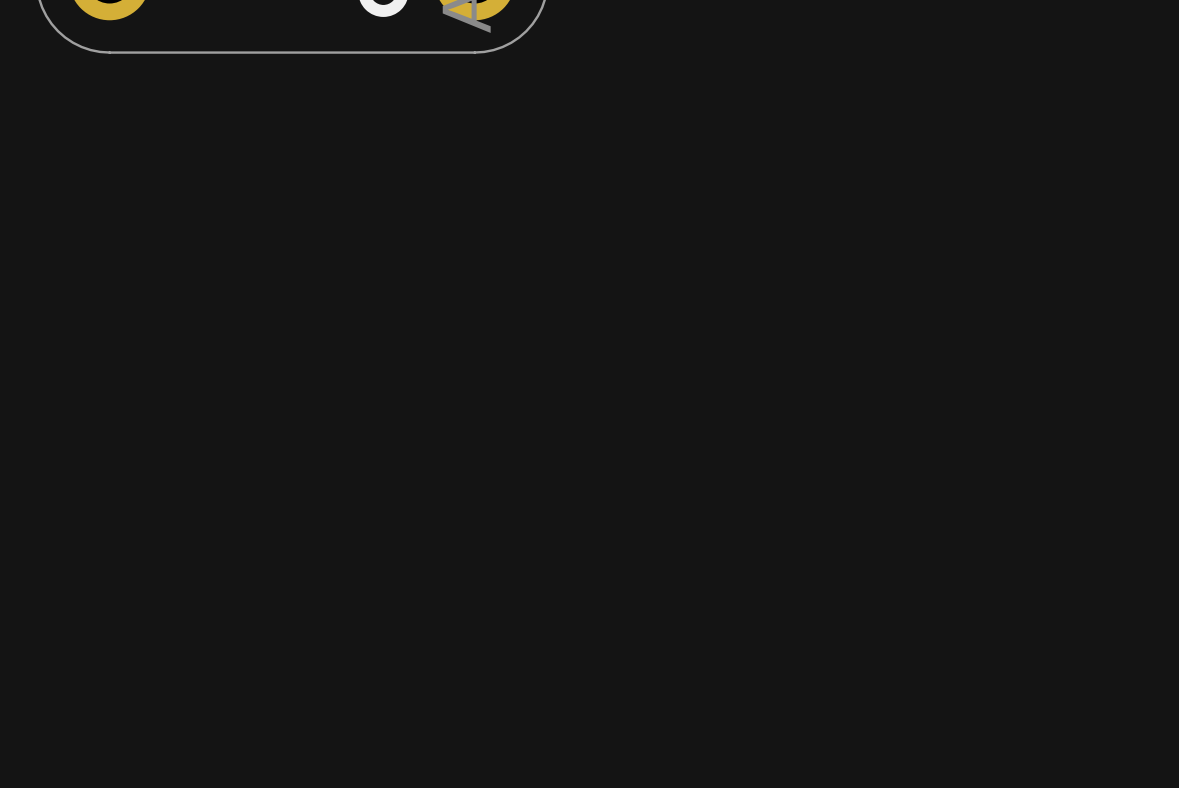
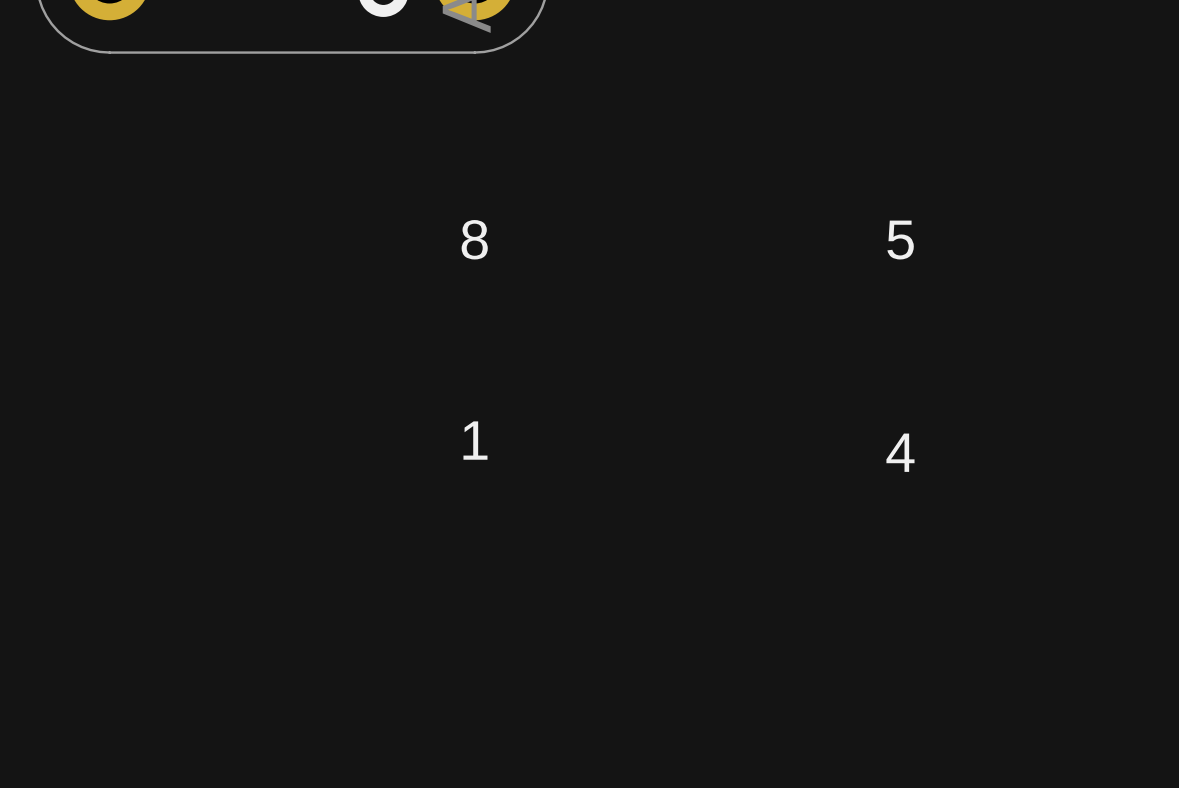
text: none -> 8 (474, 239)
text: none -> 5 (900, 240)
text: none -> 1 (475, 440)
text: none -> 4 (900, 452)

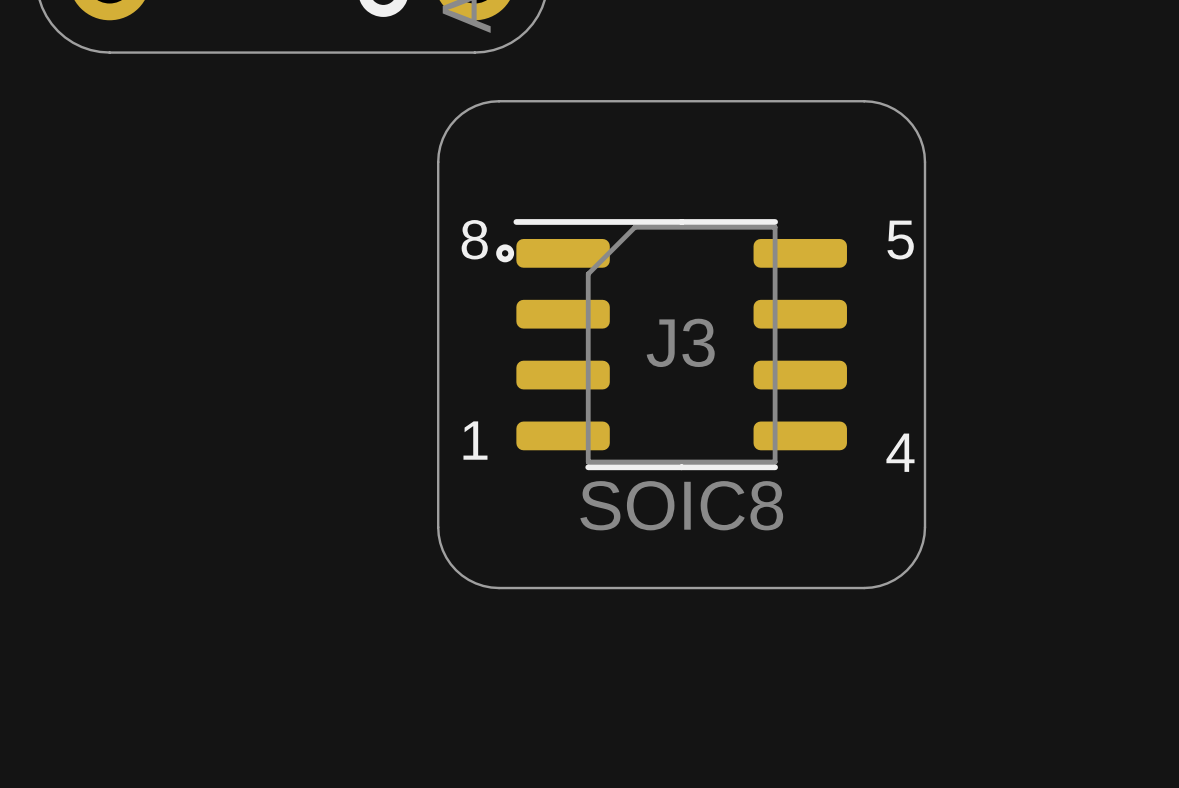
board edge: none -> (499, 101) (864, 101) (879, 103) (894, 109) (912, 125) (922, 146) (924, 162) (924, 527) (922, 542) (916, 557) (901, 575) (879, 585) (864, 588) (499, 588) (483, 585) (468, 579) (450, 564) (440, 542) (438, 527) (438, 154) (446, 131) (462, 113) (483, 103) (499, 101)
drawing: none -> [496, 244, 515, 263]
J3: none -> SOIC8 (680, 344)

